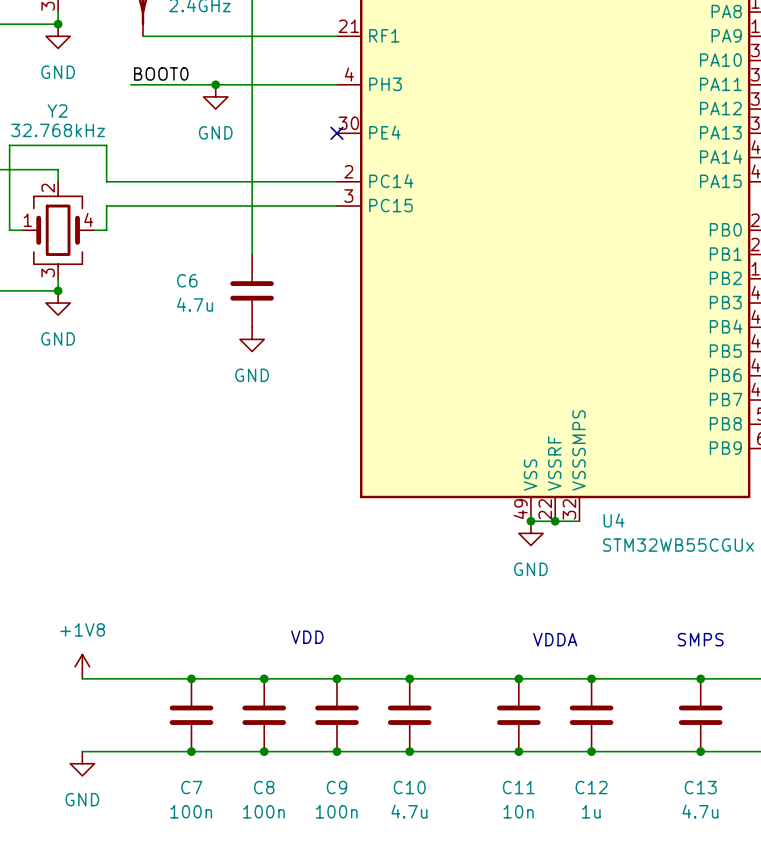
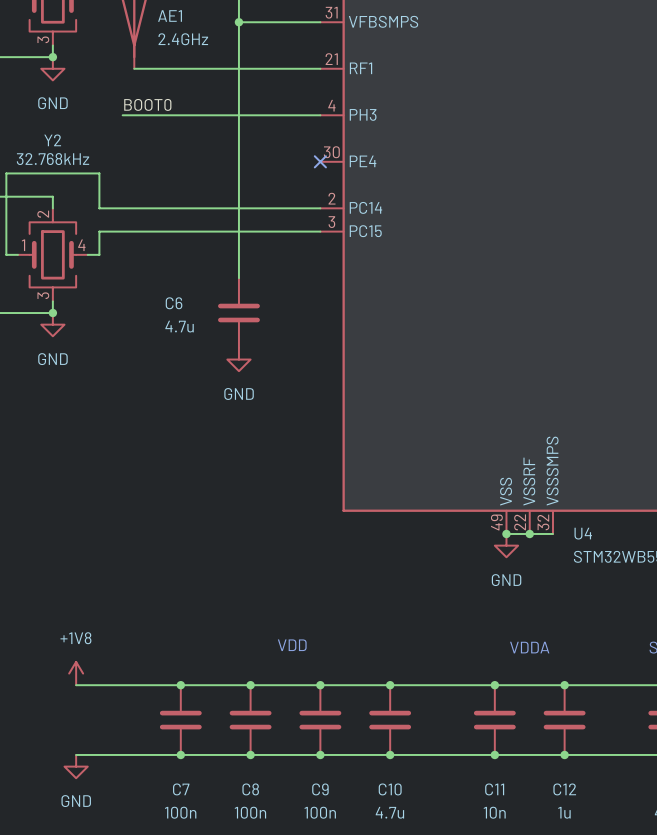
junction: (215, 84) -> none
power symbol: GND (215, 96) -> none

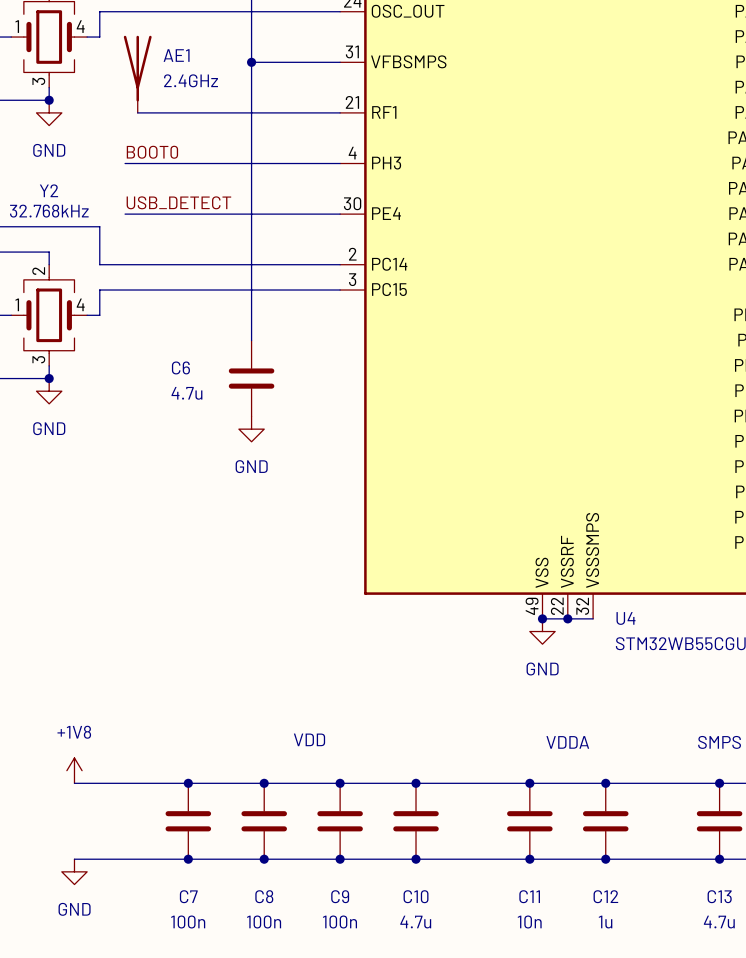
label: none -> USB_DETECT (178, 202)
wire: none -> (125, 214) (340, 214)
no-connect mark: (320, 161) -> none

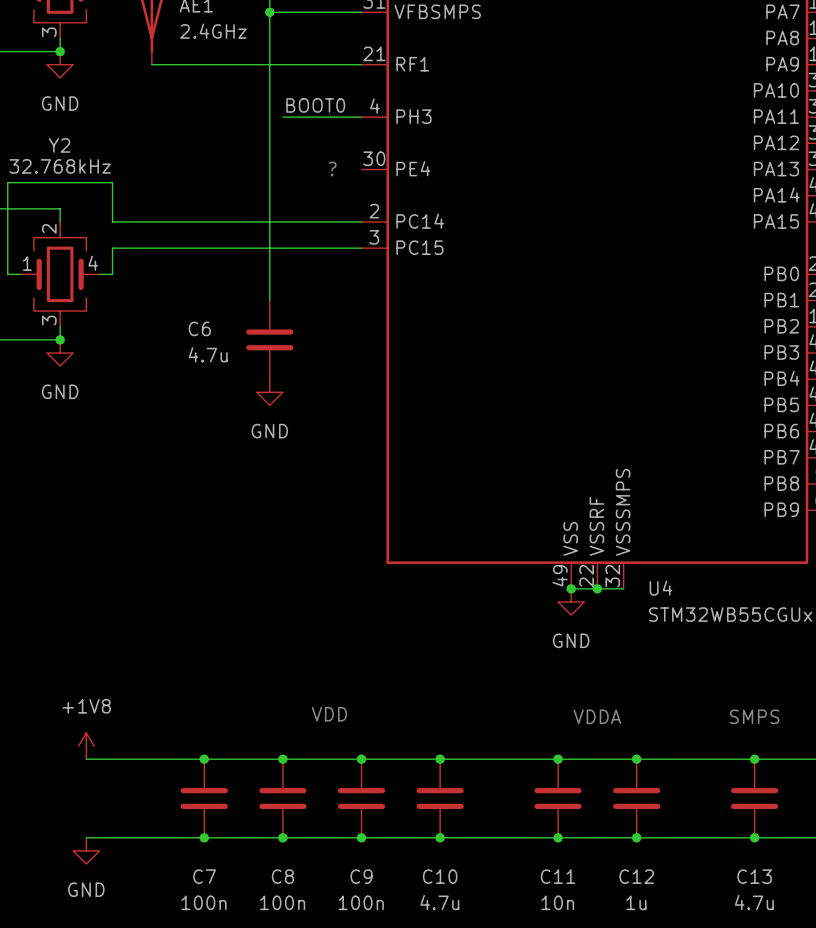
label position: BOOT0 (152, 152) -> BOOT0 (315, 105)
wire: (125, 163) (264, 163) -> none
label: USB_DETECT (178, 202) -> none
text: none -> ? (332, 169)
wire: (125, 214) (340, 214) -> none

